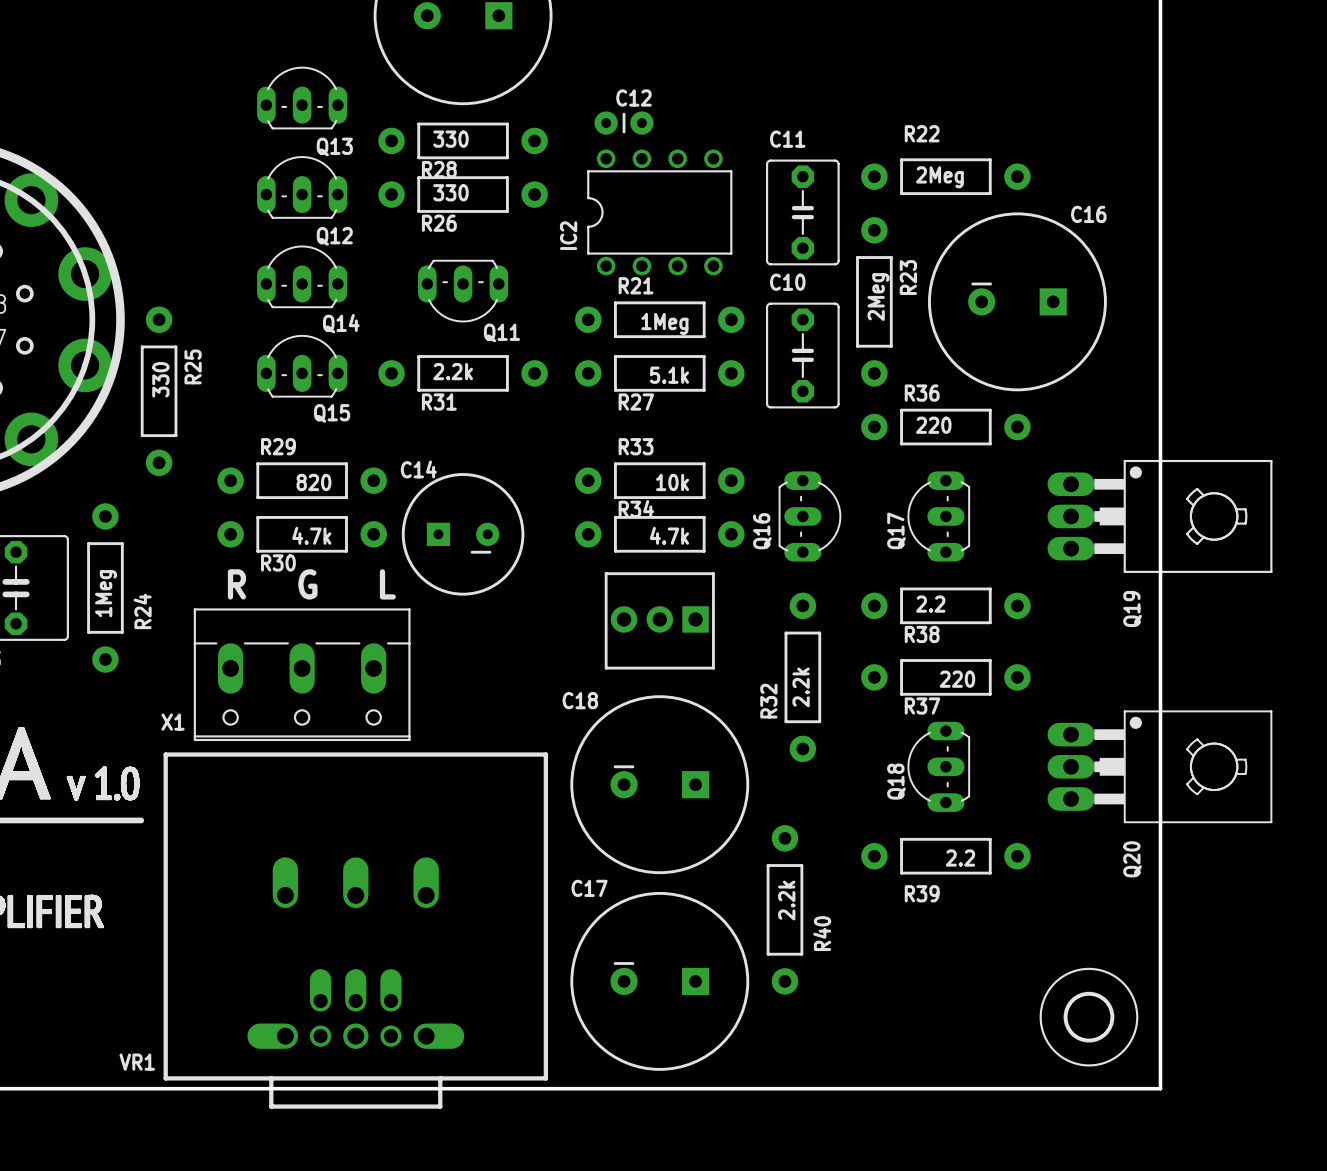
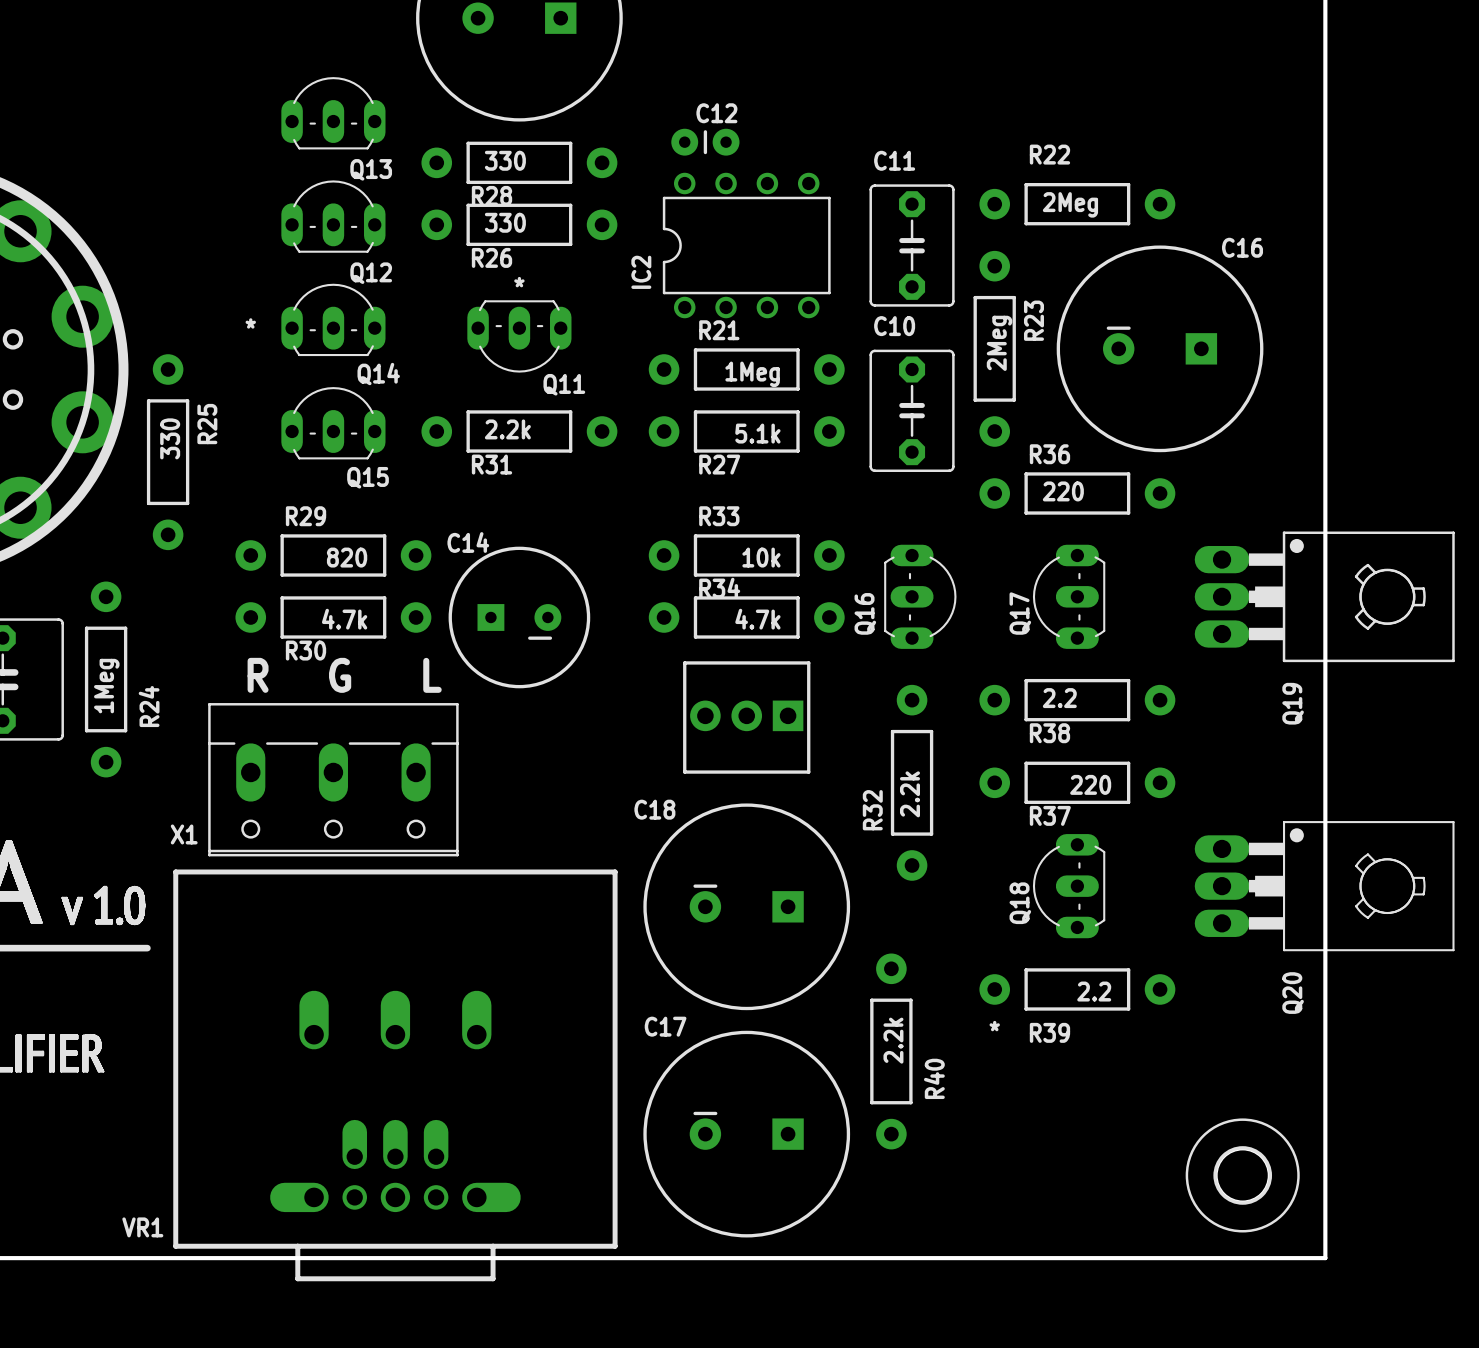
text: none -> * (519, 282)
text: none -> * (250, 323)
text: none -> * (994, 1026)

